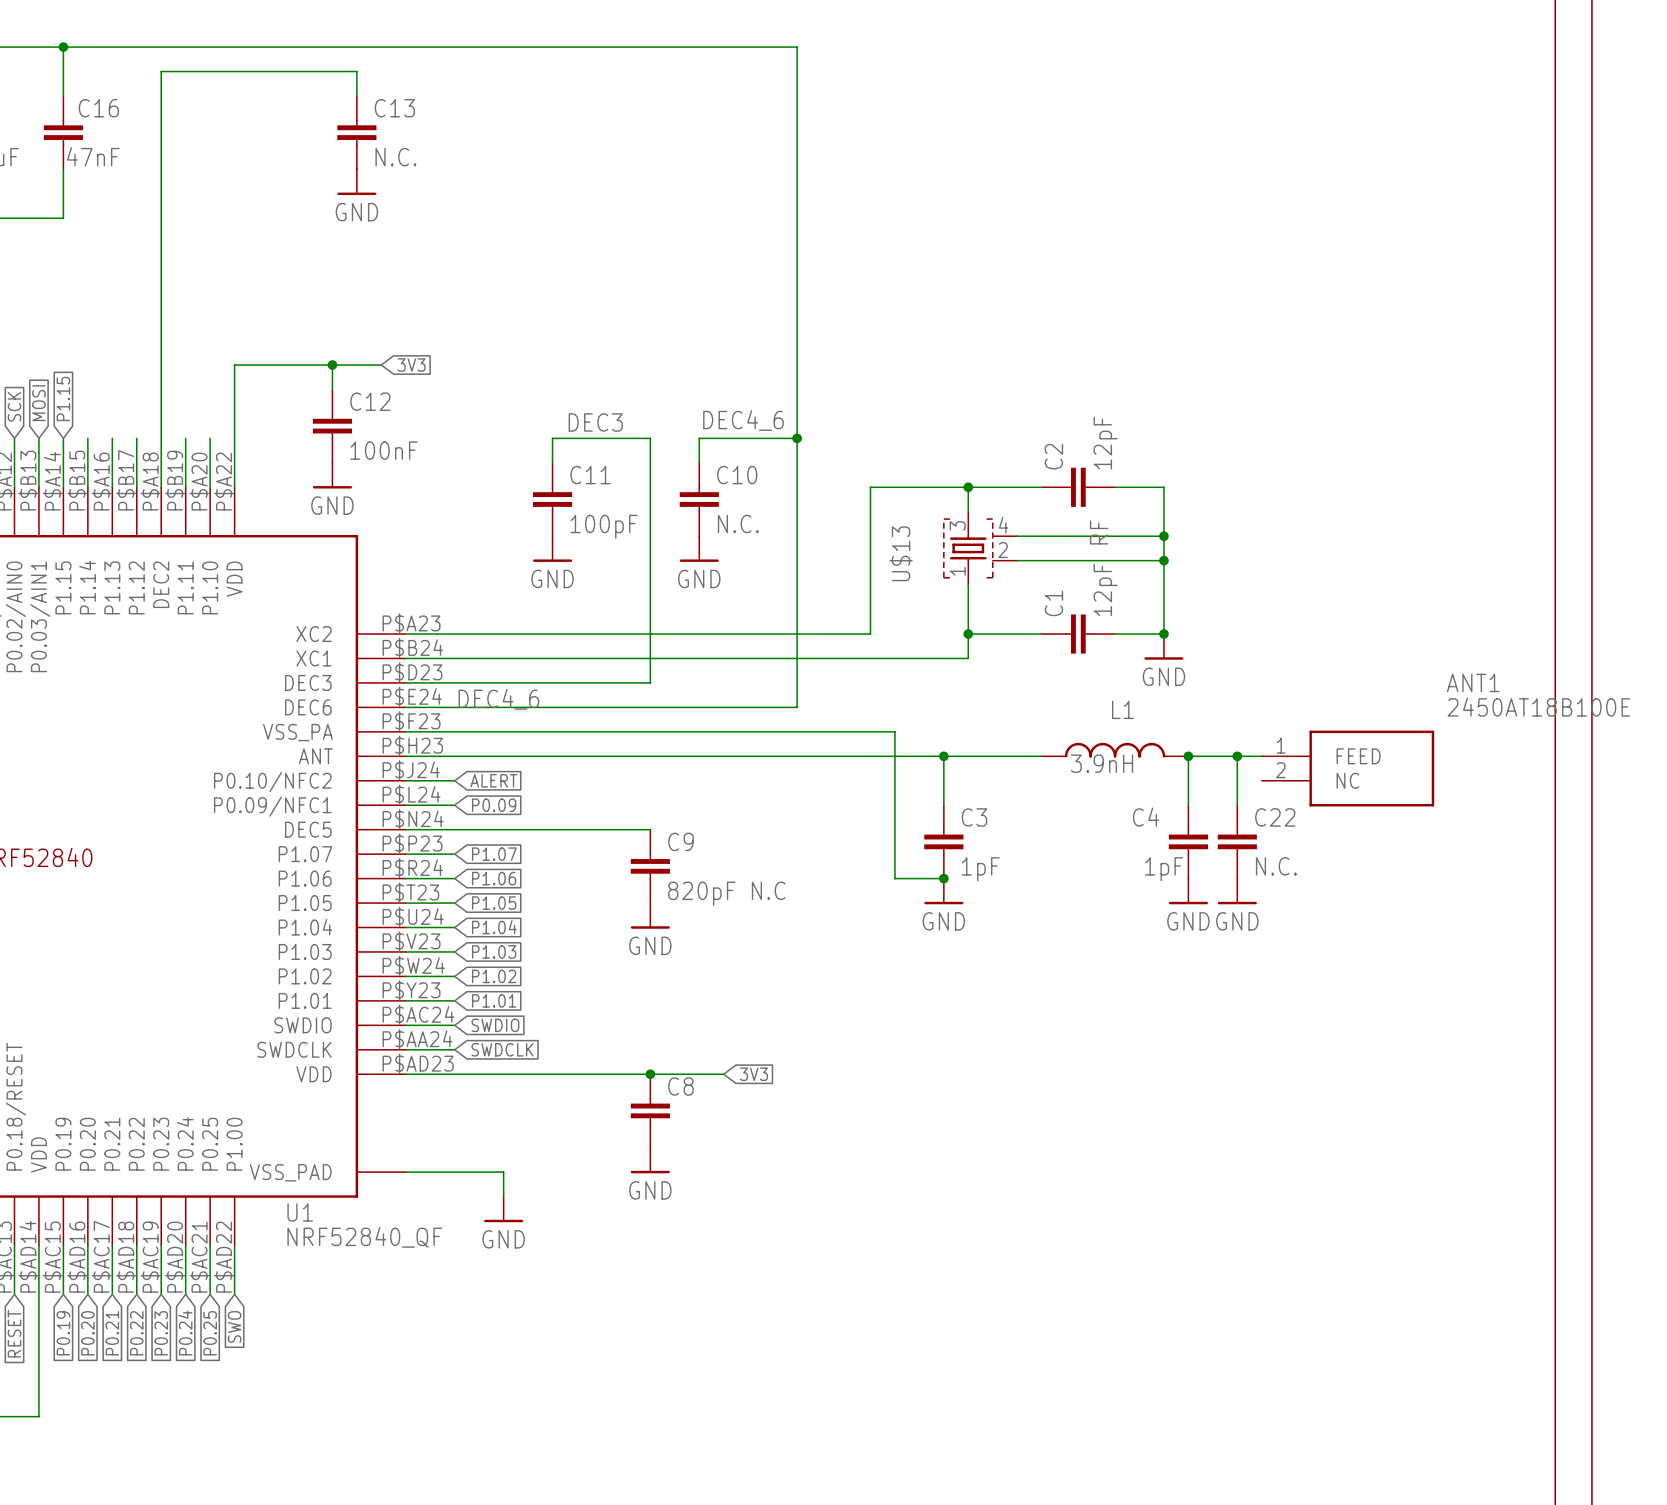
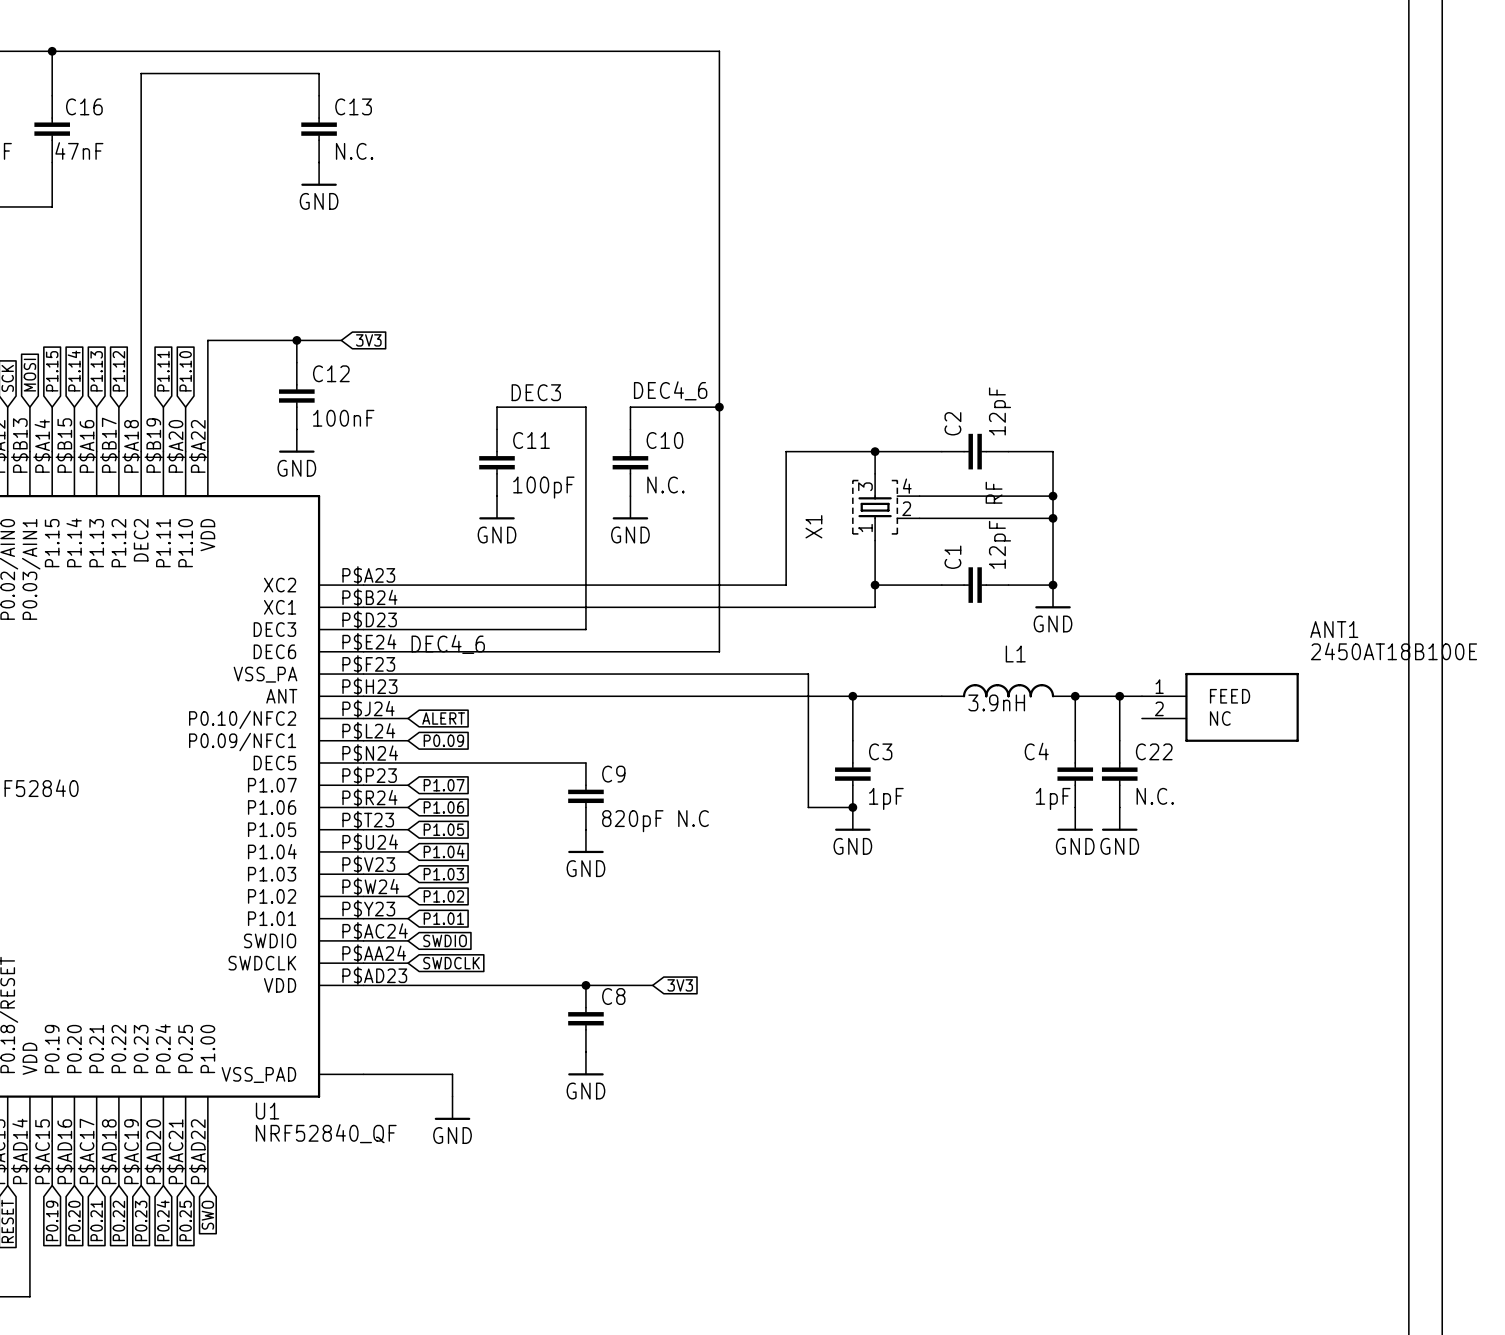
global label: none -> P1.14 (74, 371)
global label: none -> P1.13 (96, 371)
global label: none -> P1.12 (118, 371)
global label: none -> P1.11 (163, 371)
global label: none -> P1.10 (185, 371)
U$13 name: U$13 (901, 553) -> X1 (813, 526)

